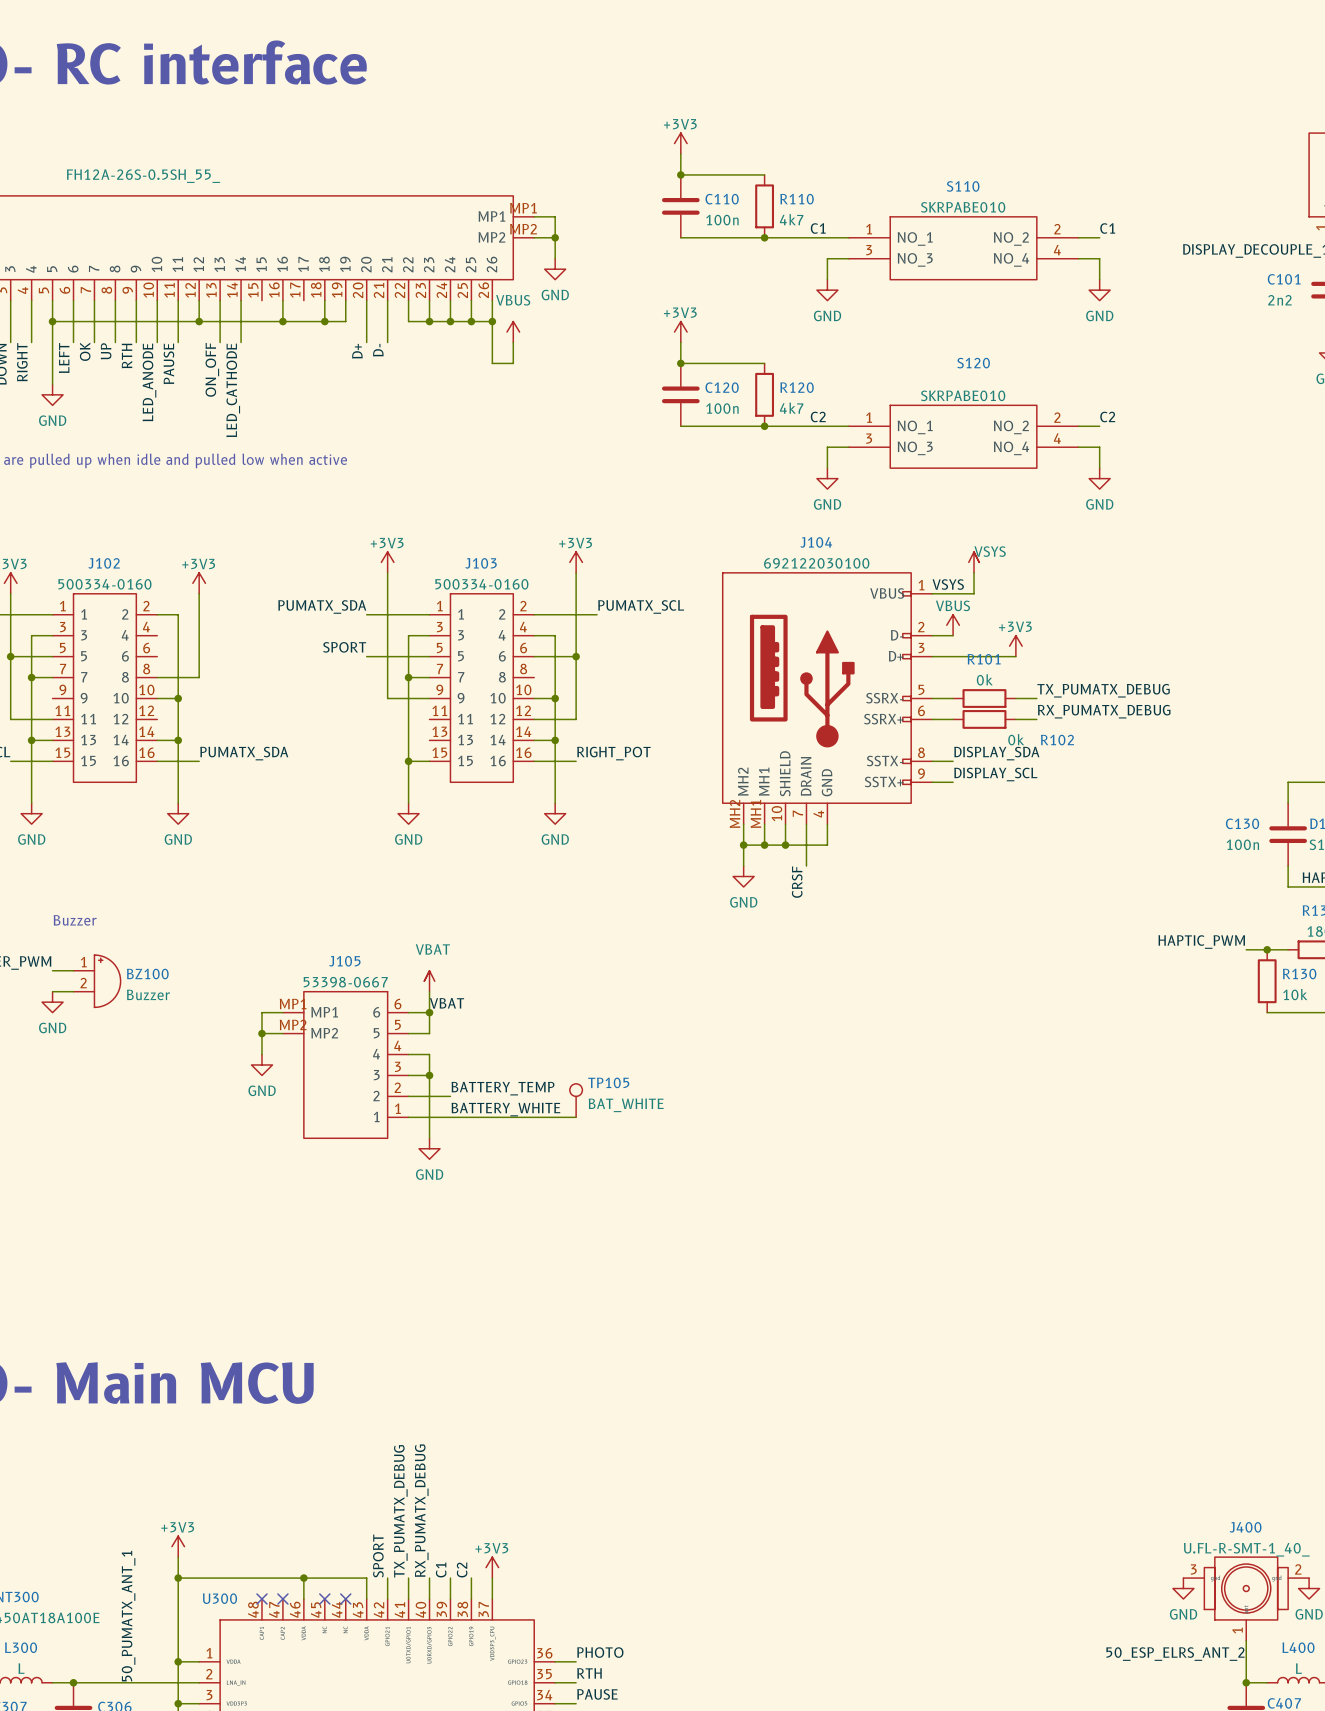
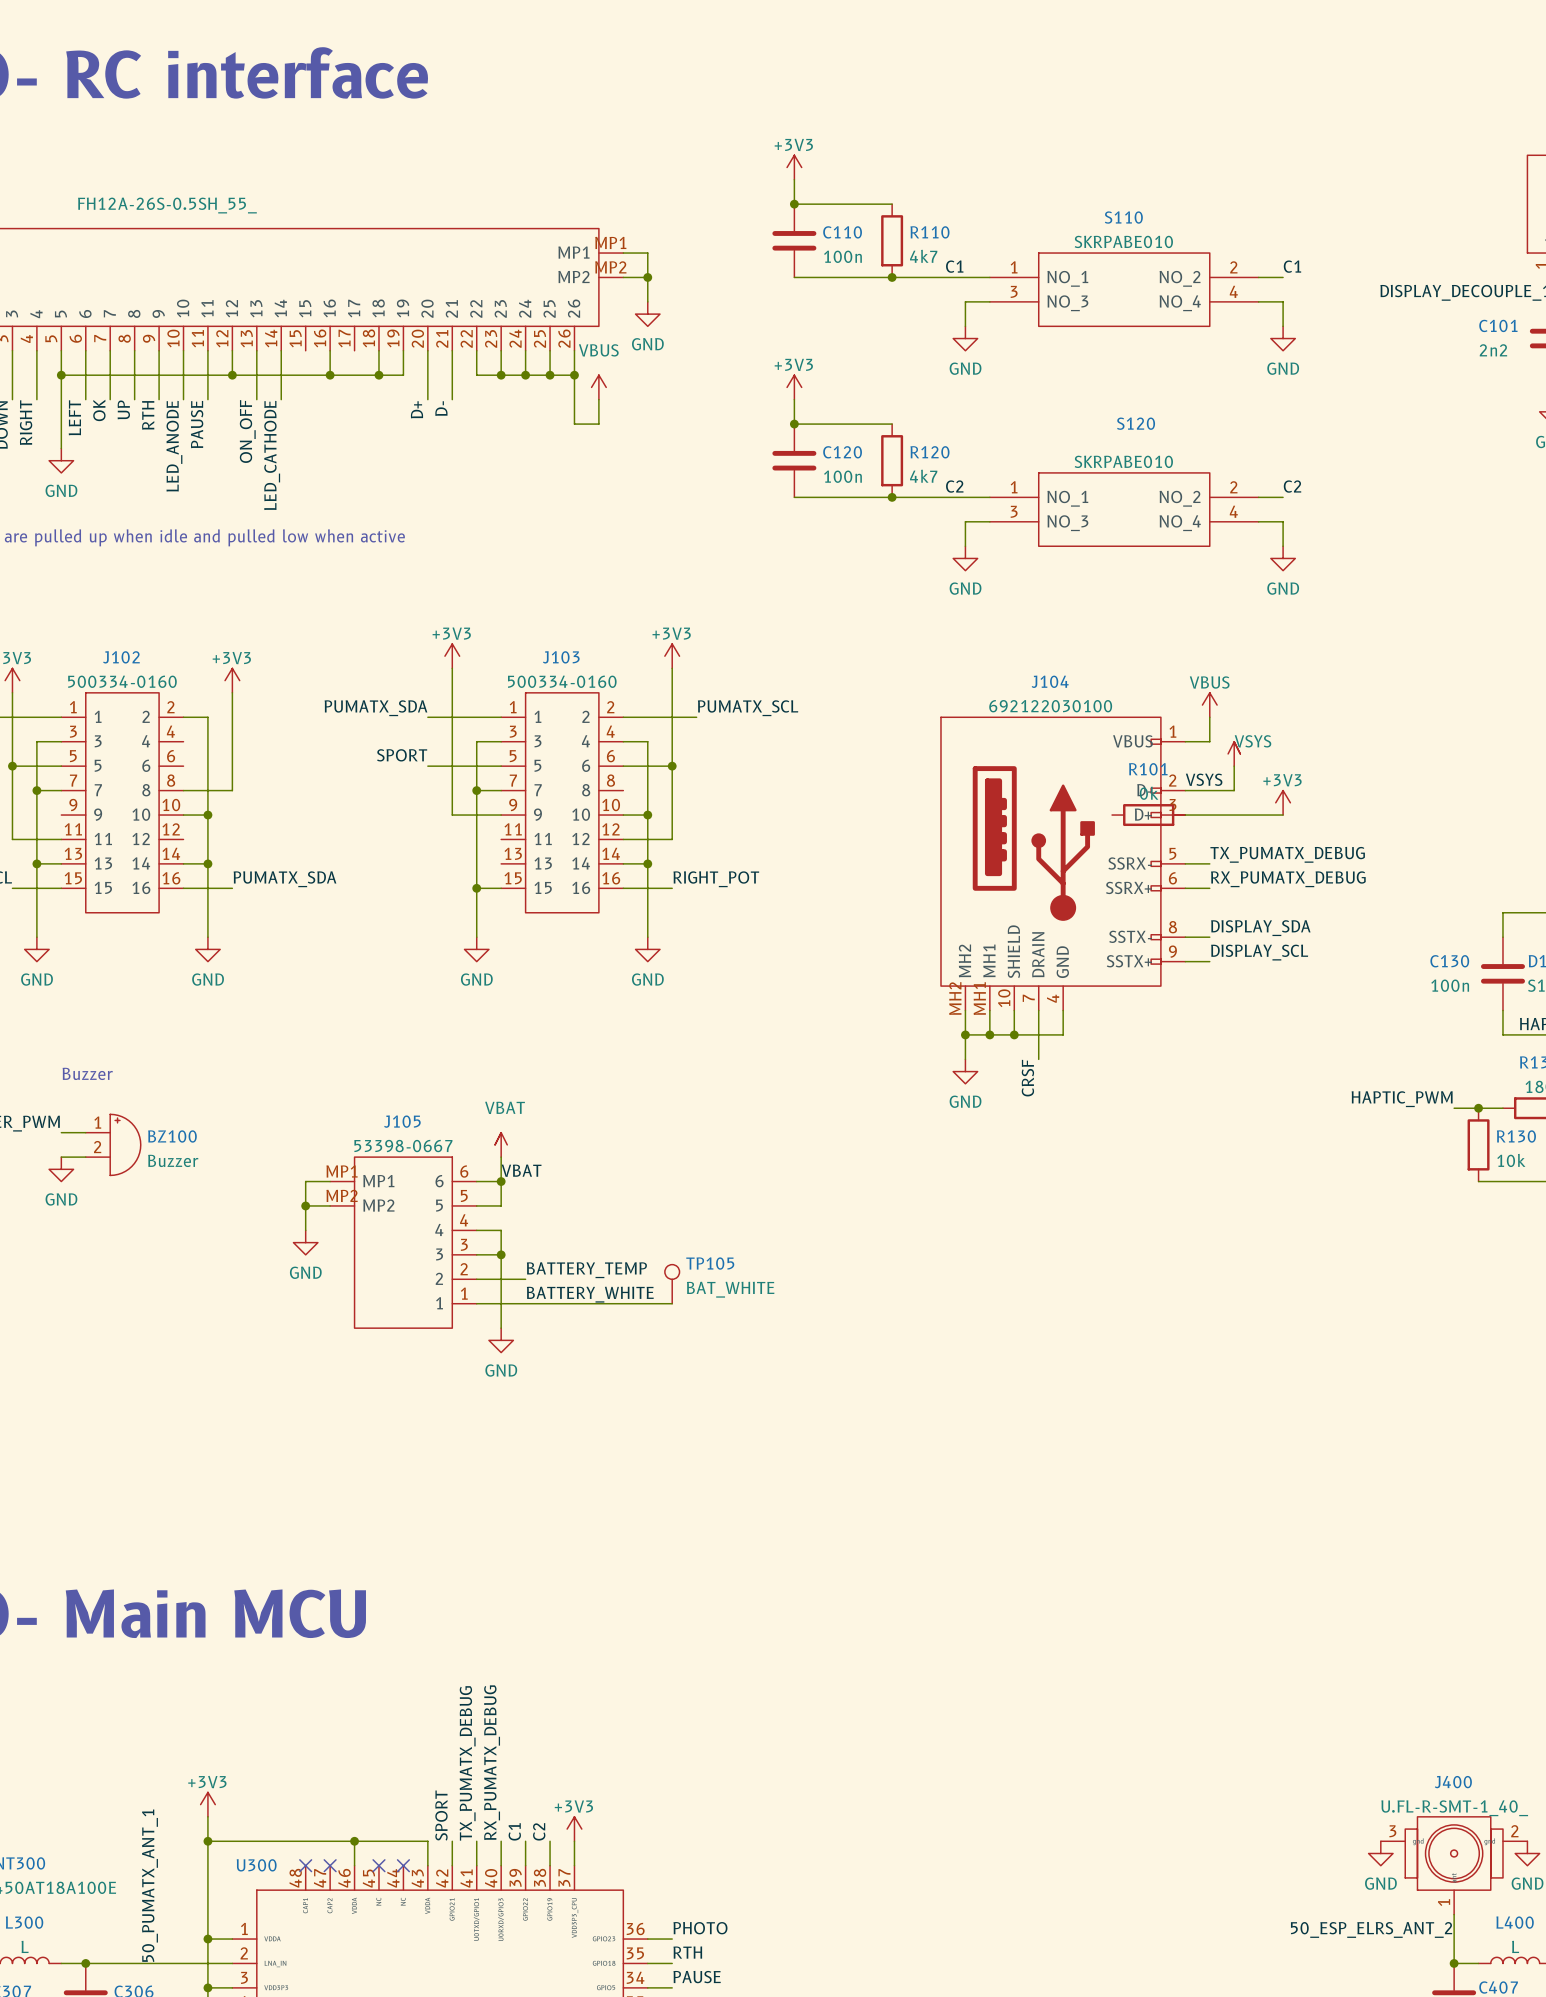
power symbol position: VSYS (974, 562) -> VSYS (1234, 753)
wire: (974, 572) (974, 593) (932, 593) -> (1234, 766) (1234, 790) (1185, 790)
label position: VSYS (948, 584) -> VSYS (1204, 779)
wire: none -> (1209, 717) (1209, 741) (1185, 741)
power symbol position: VBUS (953, 625) -> VBUS (1209, 705)
wire: (932, 635) (953, 635) -> none
power symbol position: +3V3 (1015, 646) -> +3V3 (1283, 802)
wire: (932, 656) (1015, 656) -> none
label position: TX_PUMATX_DEBUG (1103, 690) -> TX_PUMATX_DEBUG (1287, 854)
J104 position: (827, 698) -> (1062, 863)
wire: (932, 698) (953, 698) -> (1185, 863) (1209, 863)
wire: none -> (1209, 815) (1283, 815)
label position: RX_PUMATX_DEBUG (1104, 711) -> RX_PUMATX_DEBUG (1288, 879)
wire: (932, 719) (953, 719) -> (1185, 888) (1209, 888)
R102: 0k (984, 719) -> none
wire: (1015, 719) (1036, 719) -> none
label position: DISPLAY_SDA (996, 753) -> DISPLAY_SDA (1260, 928)
wire: (932, 761) (953, 761) -> (1185, 937) (1209, 937)
label position: DISPLAY_SCL (995, 774) -> DISPLAY_SCL (1259, 952)
wire: (932, 782) (953, 782) -> (1185, 961) (1209, 961)
wire: (743, 824) (743, 866) -> (965, 1010) (965, 1059)
wire: (764, 824) (764, 845) -> (989, 1010) (989, 1034)
wire: (785, 824) (785, 845) -> (1014, 1010) (1014, 1034)
wire: (806, 824) (806, 866) -> (1038, 1010) (1038, 1059)
wire: (827, 824) (827, 845) (743, 845) -> (1063, 1010) (1063, 1034) (965, 1034)
junction: (743, 845) -> none
junction: (764, 845) -> none
junction: (785, 845) -> none
power symbol position: GND (743, 876) -> GND (965, 1071)
label position: CRSF (797, 882) -> CRSF (1027, 1078)
junction: none -> (965, 1034)
junction: none -> (989, 1034)
junction: none -> (1014, 1034)

